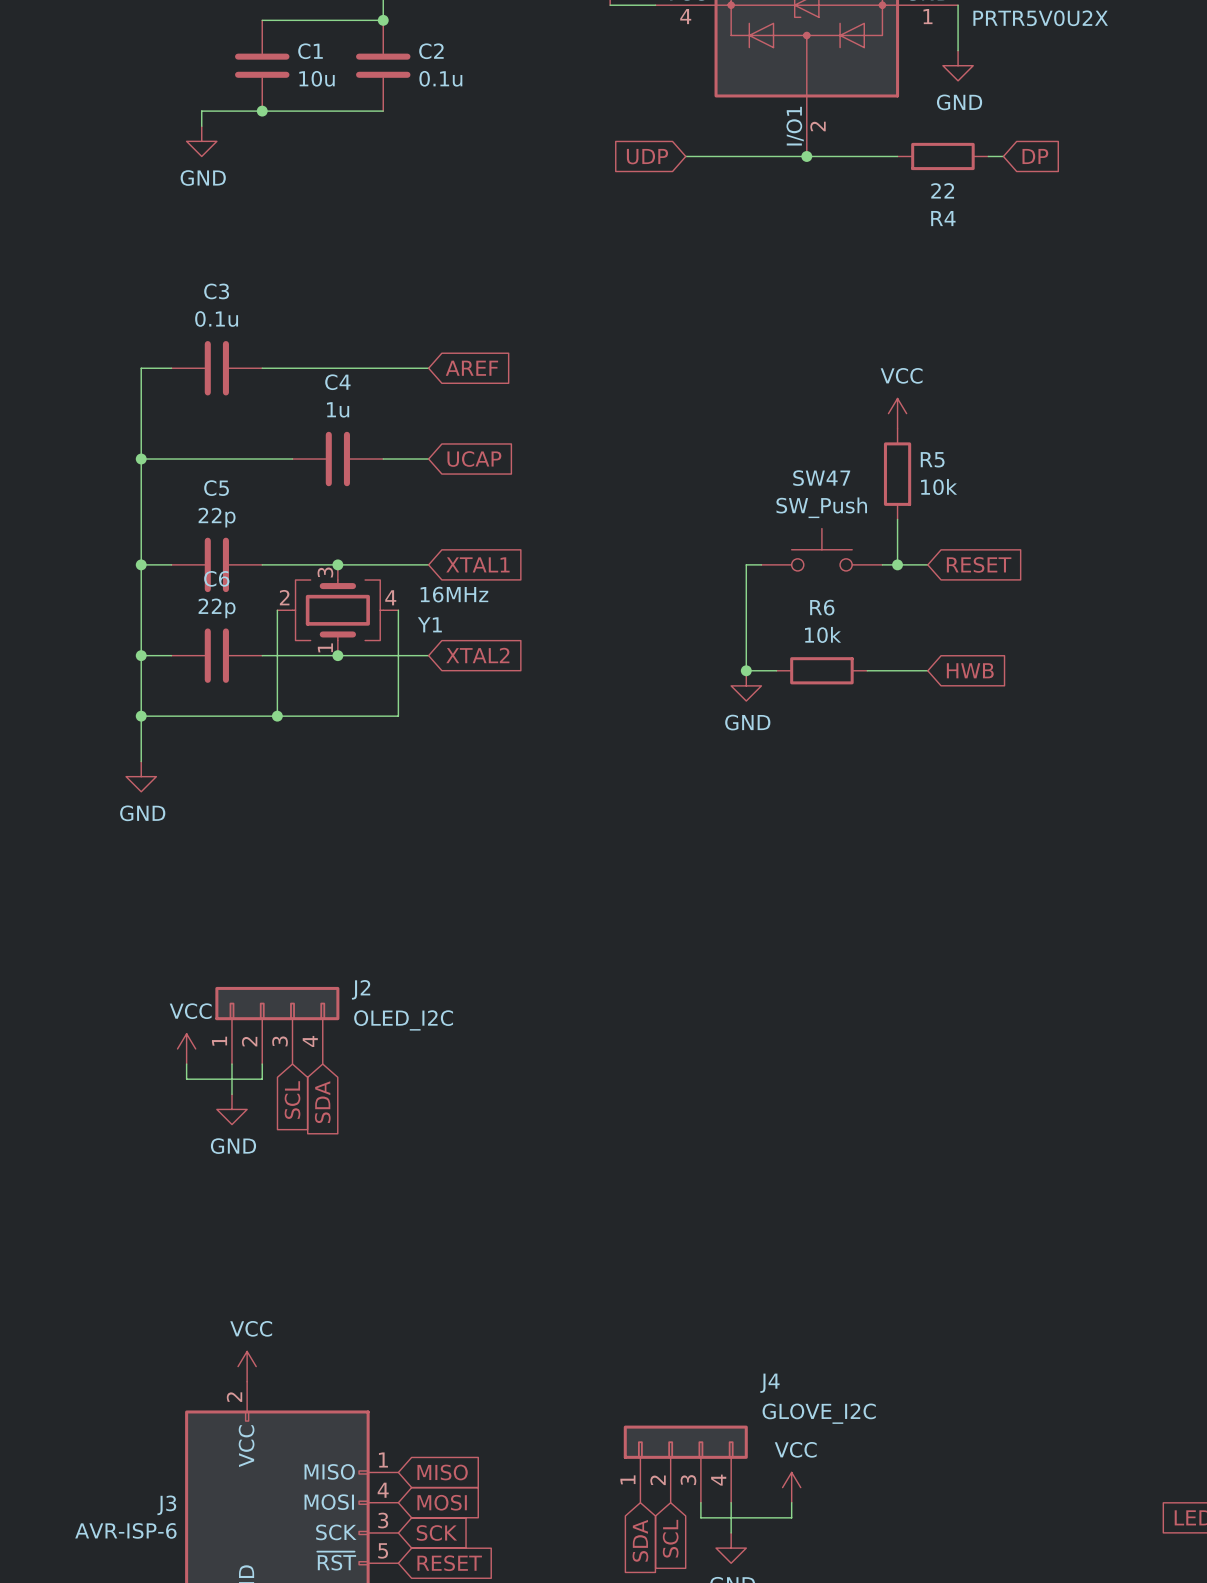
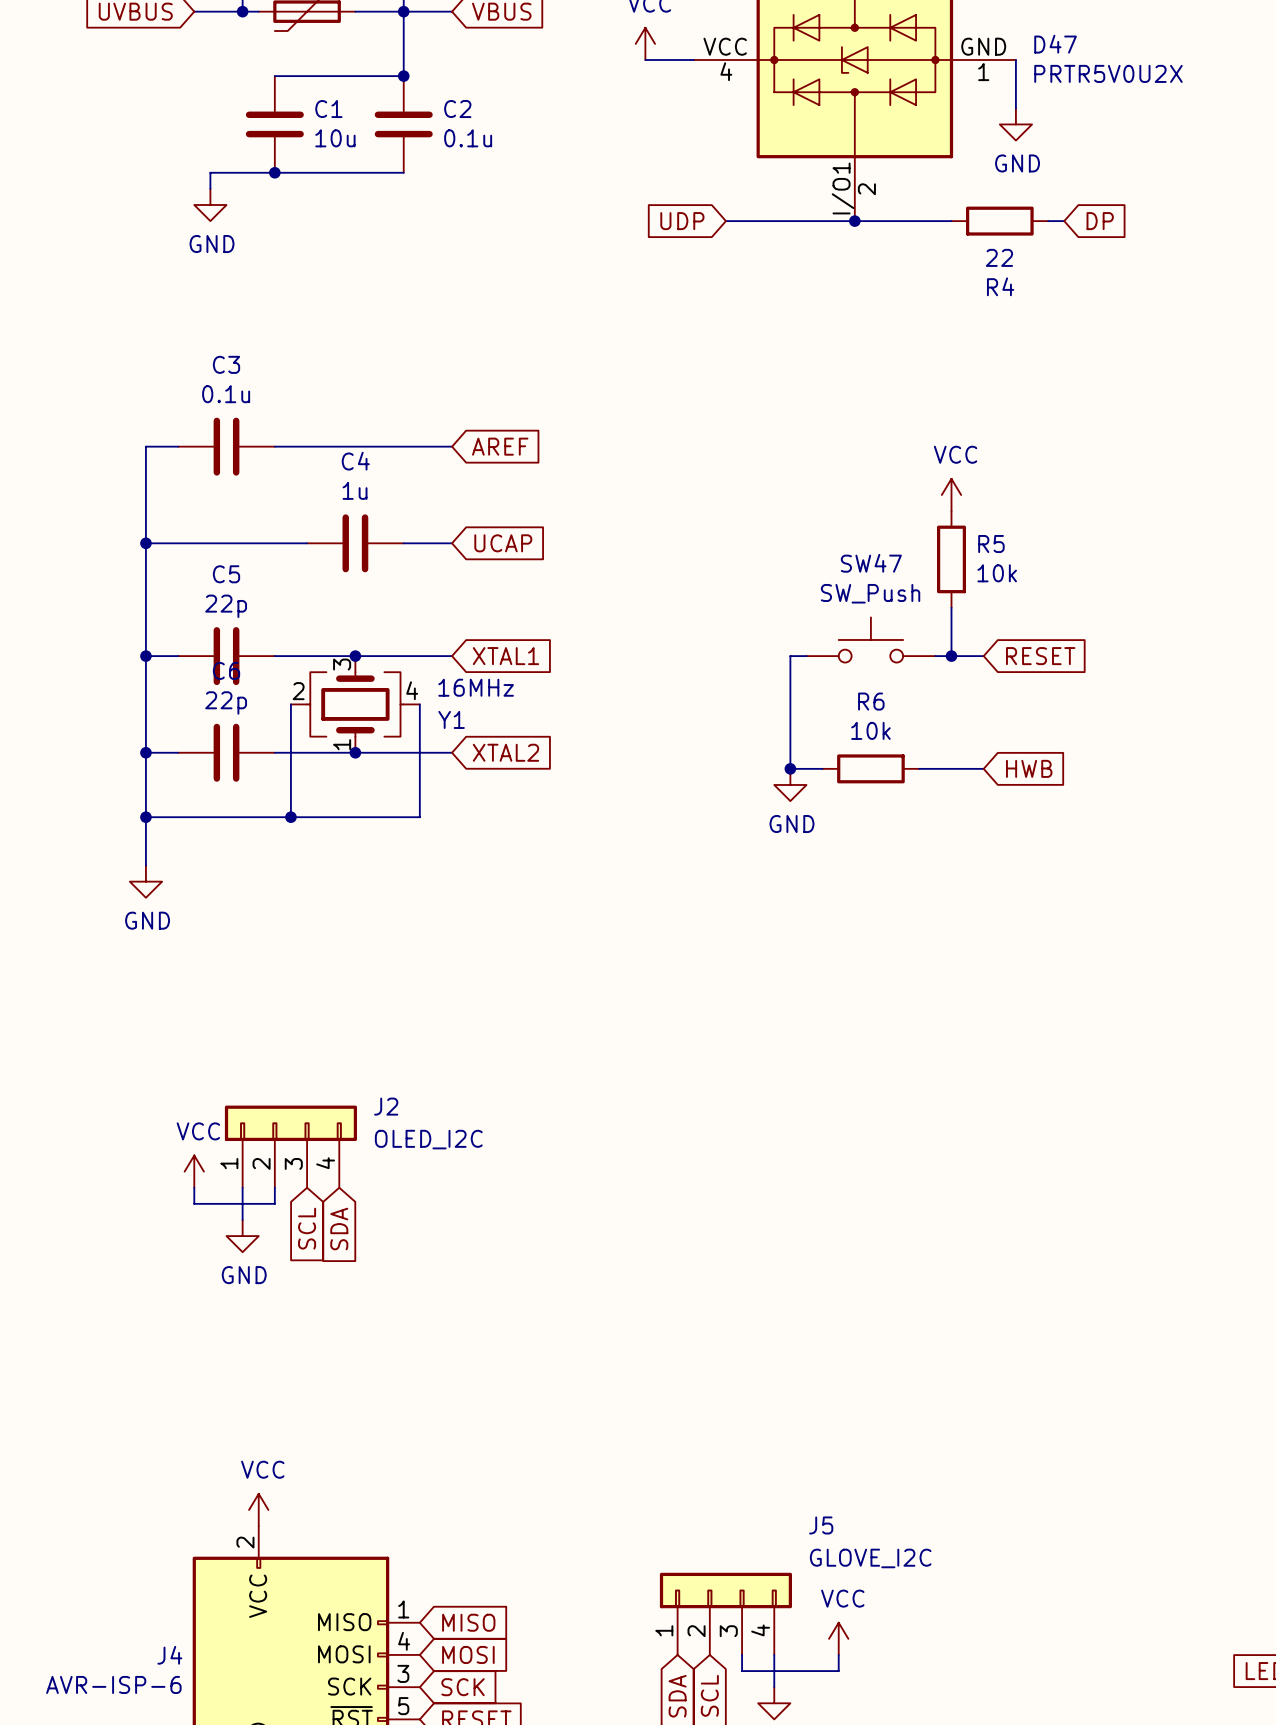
J4 name: J4 (769, 1383) -> J5 (821, 1525)
J3 name: J3 (166, 1505) -> J4 (169, 1655)

